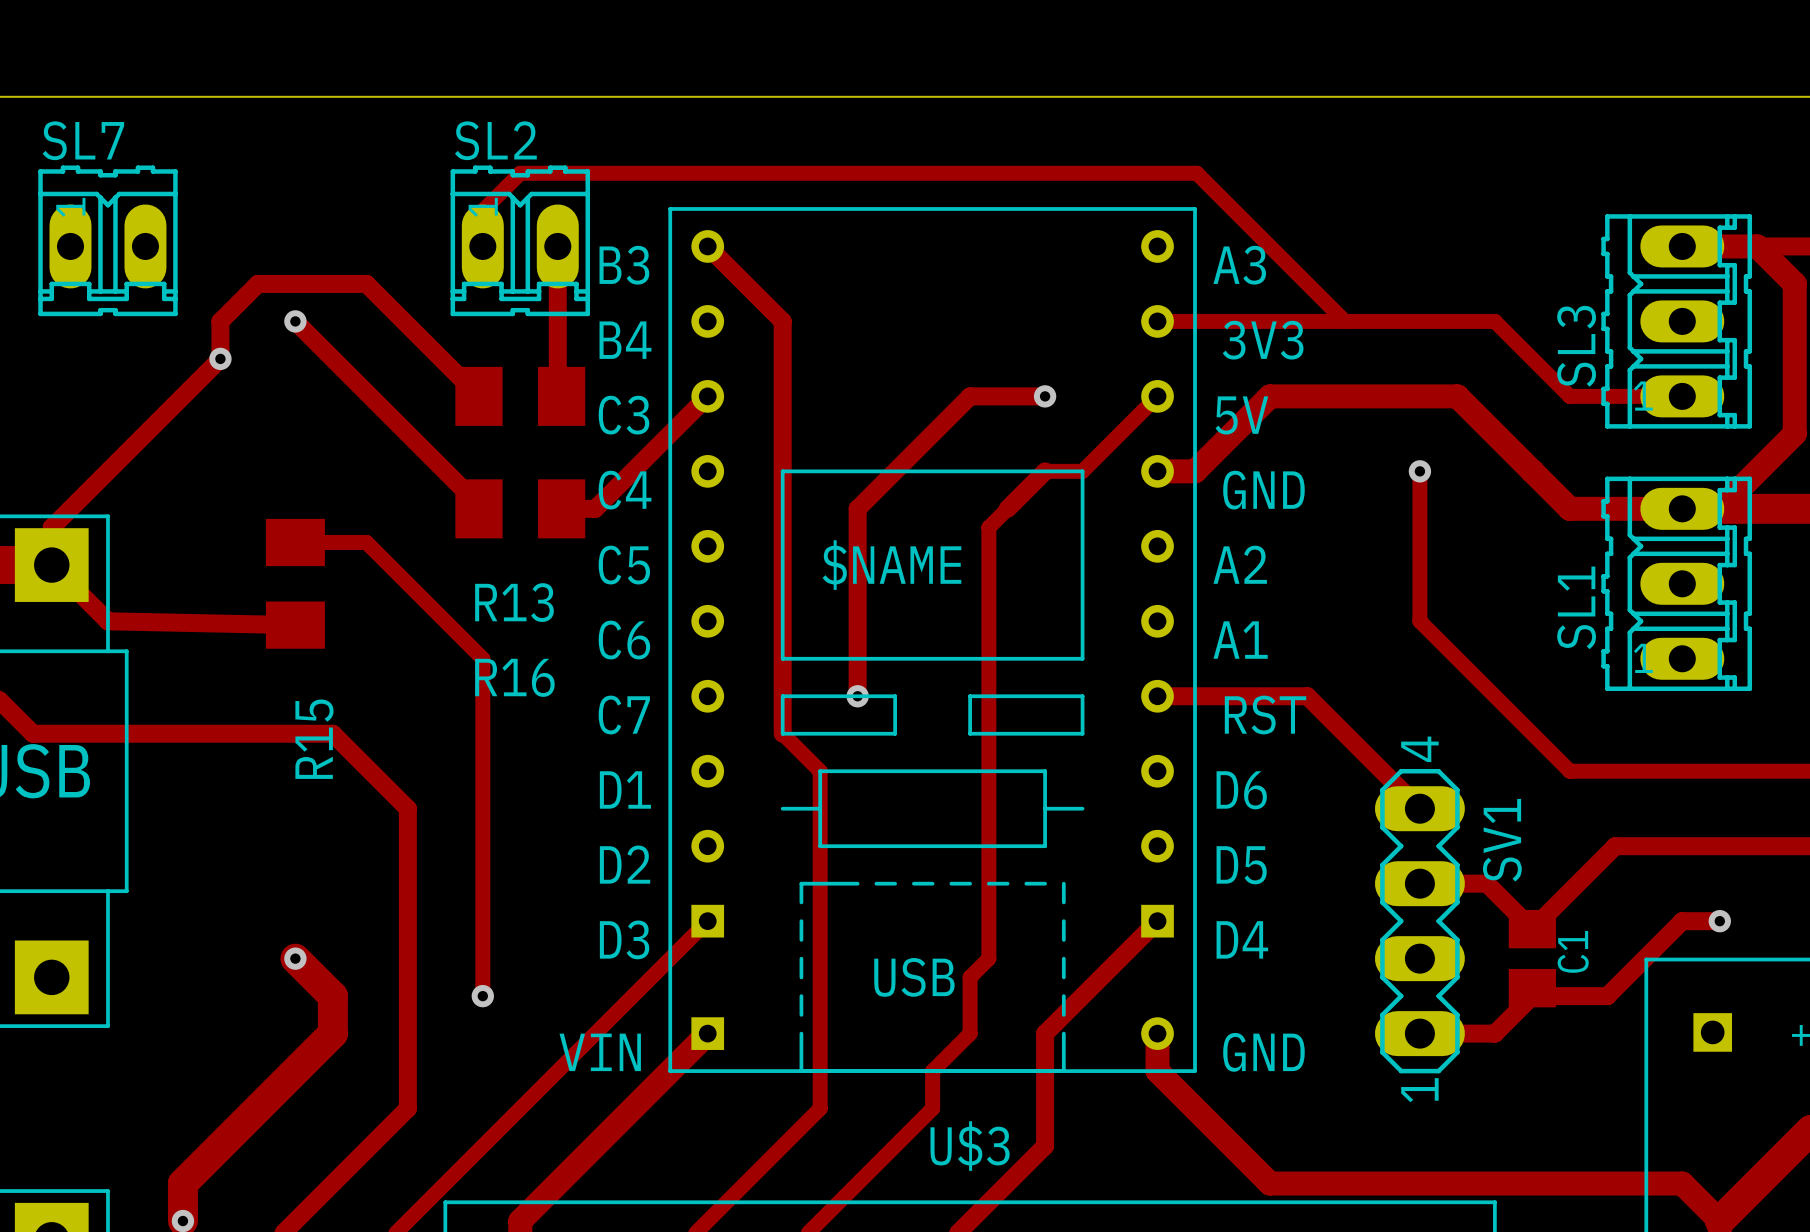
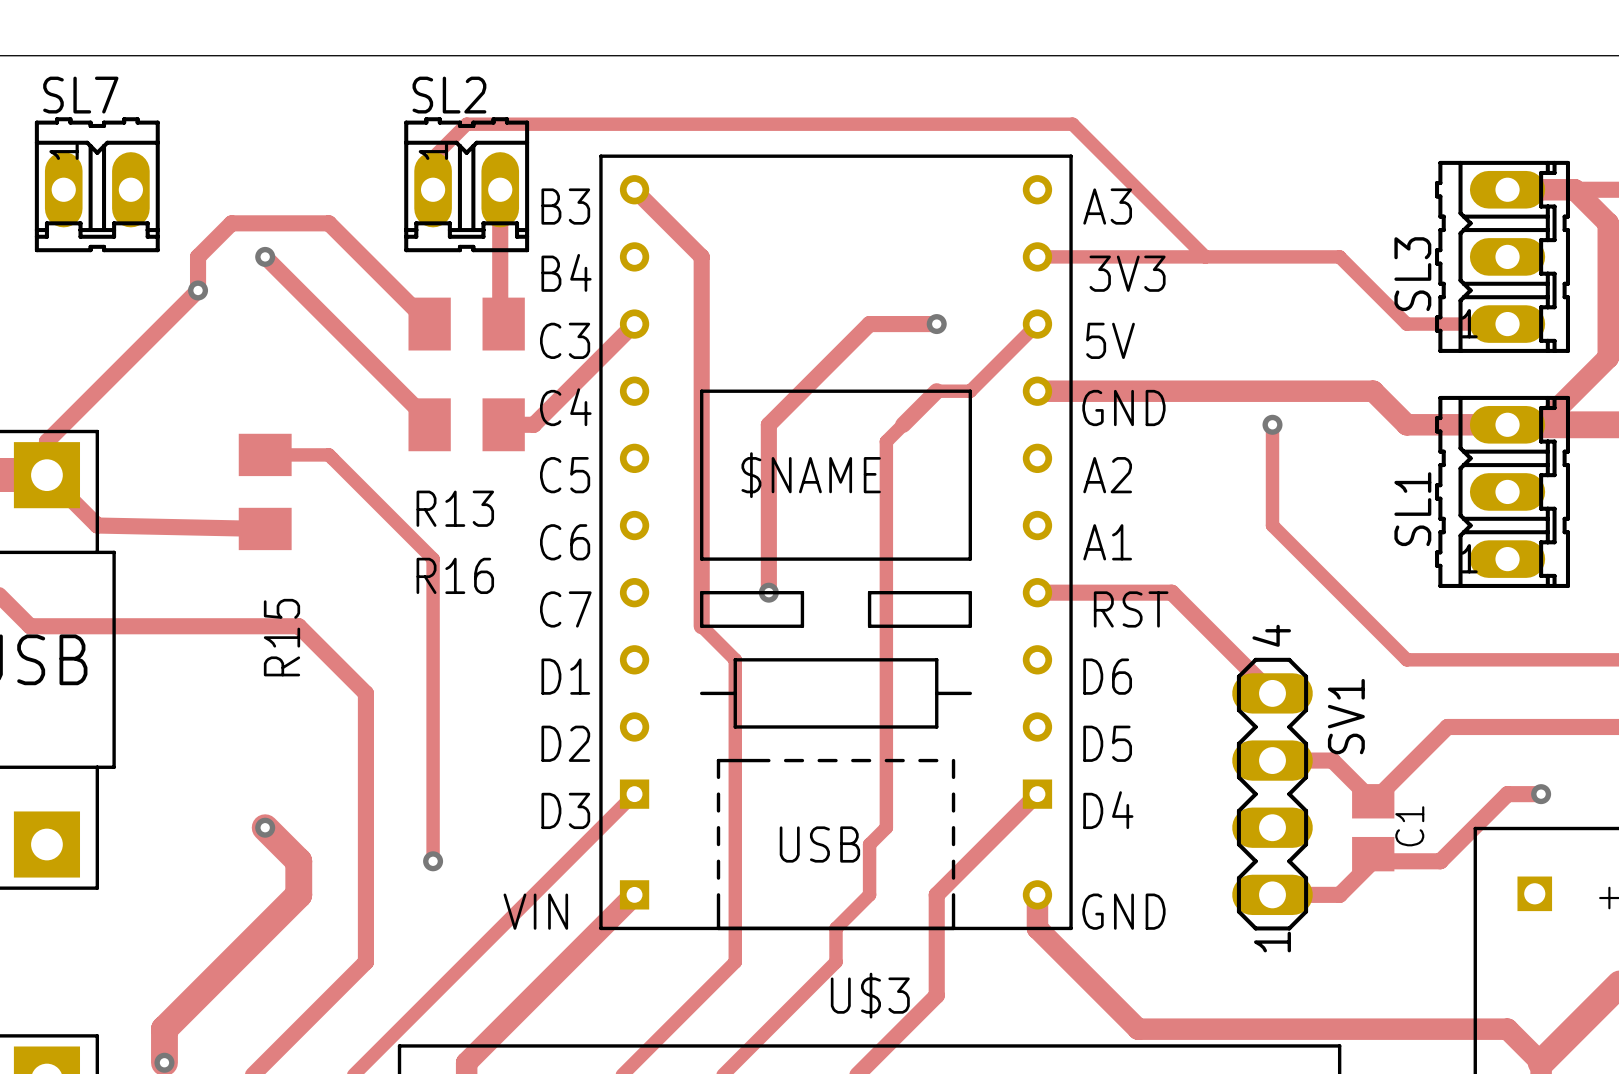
track: (1195, 471) (1269, 396) (1457, 396) (1532, 471) -> (1071, 391) (1373, 391)
track: (1419, 471) (1419, 508) -> none
via position: (1419, 471) -> (1272, 424)

